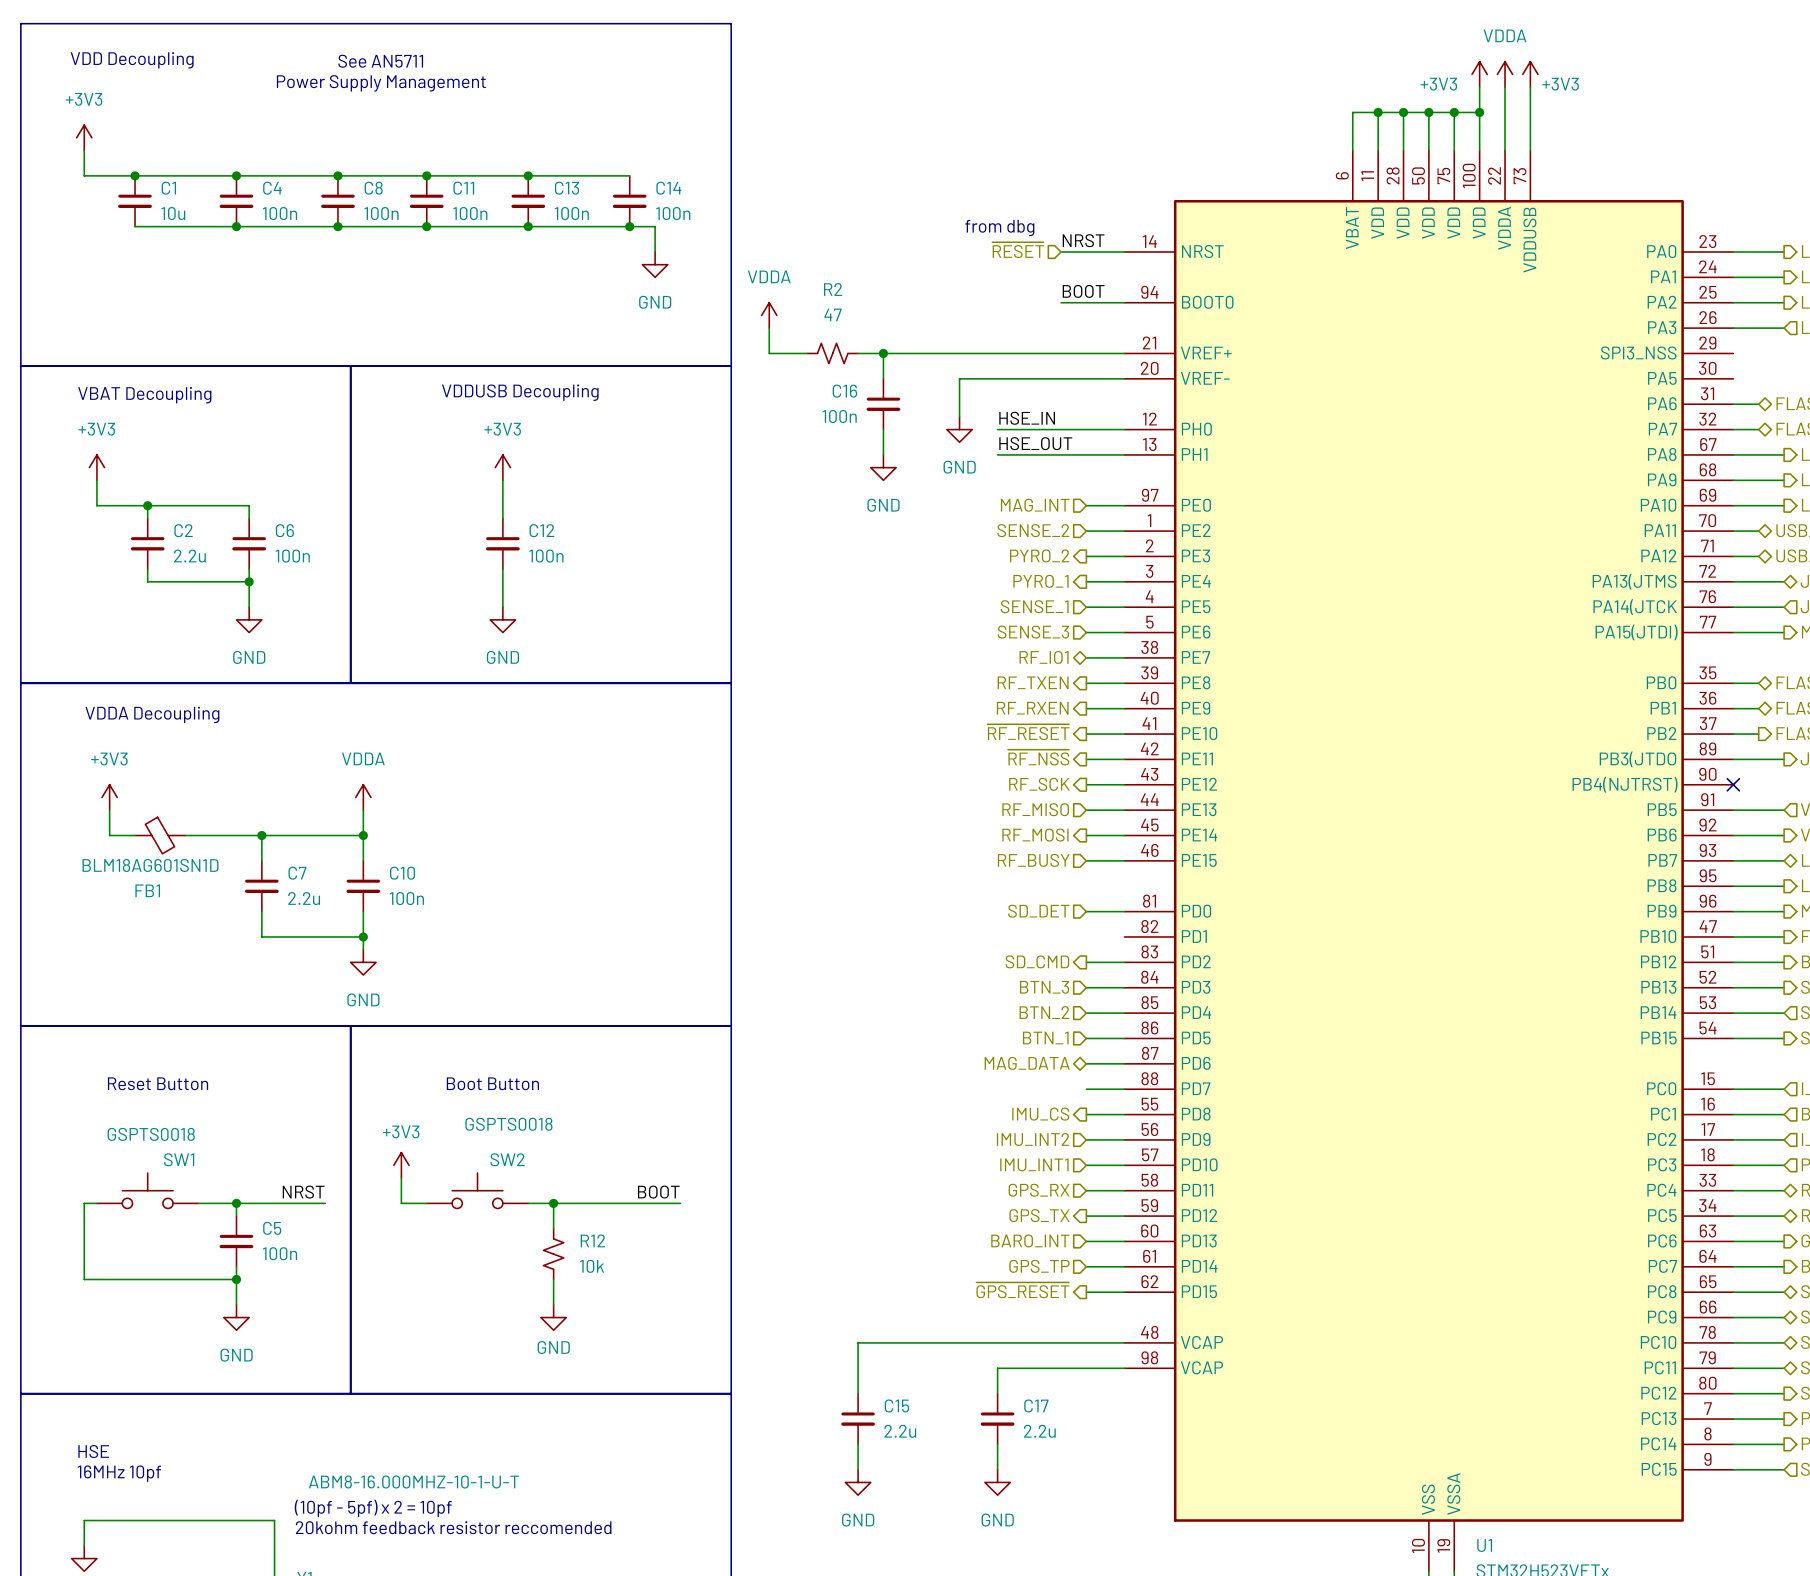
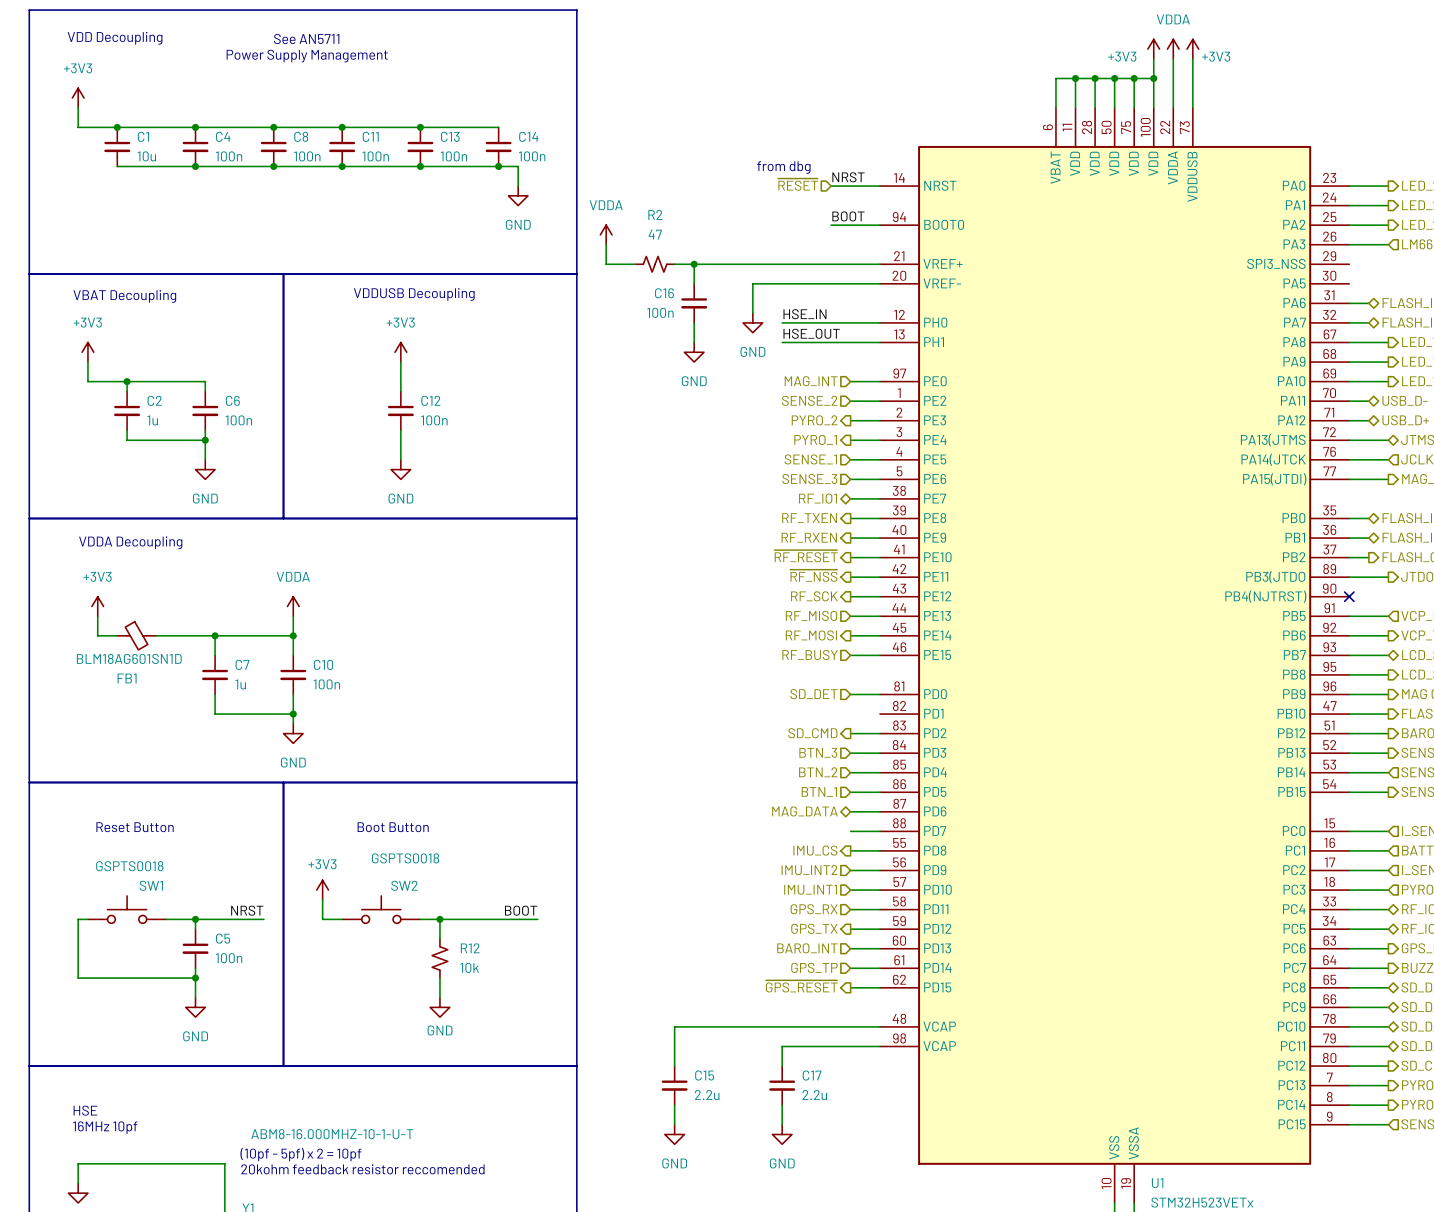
C2 value: 2.2u (189, 556) -> 1u (152, 420)
C7 value: 2.2u (304, 898) -> 1u (240, 684)

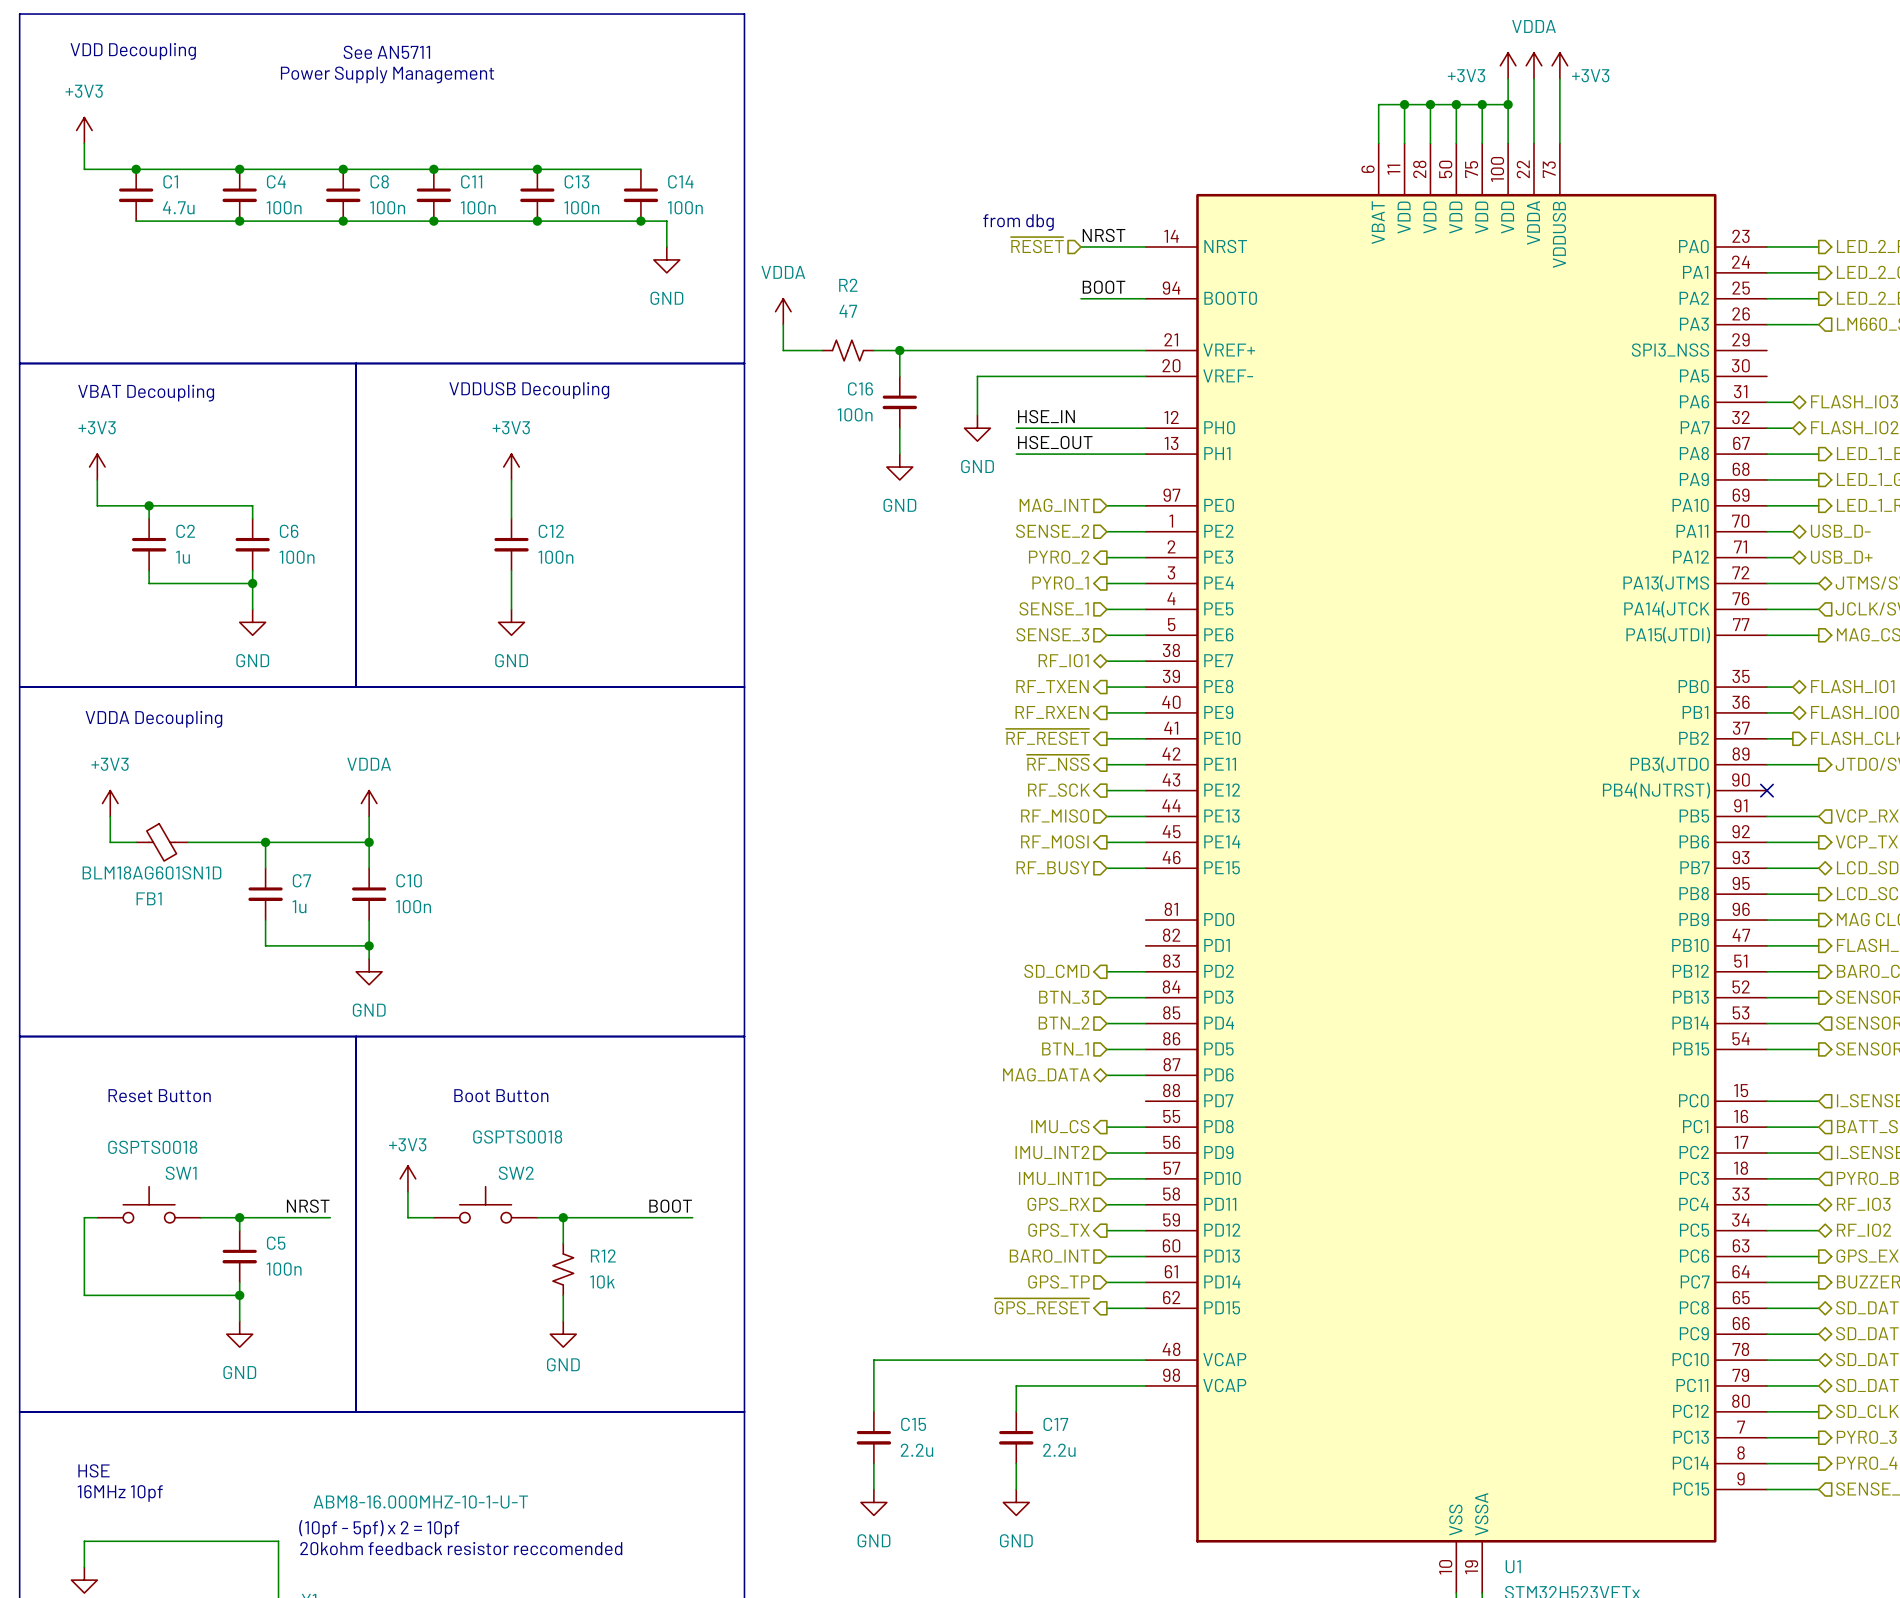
C1 value: 10u (146, 156) -> 4.7u (178, 207)
hierarchical label: SD_DET (813, 694) -> none
wire: (850, 694) (879, 694) -> none
wire: (850, 831) (879, 831) -> none

